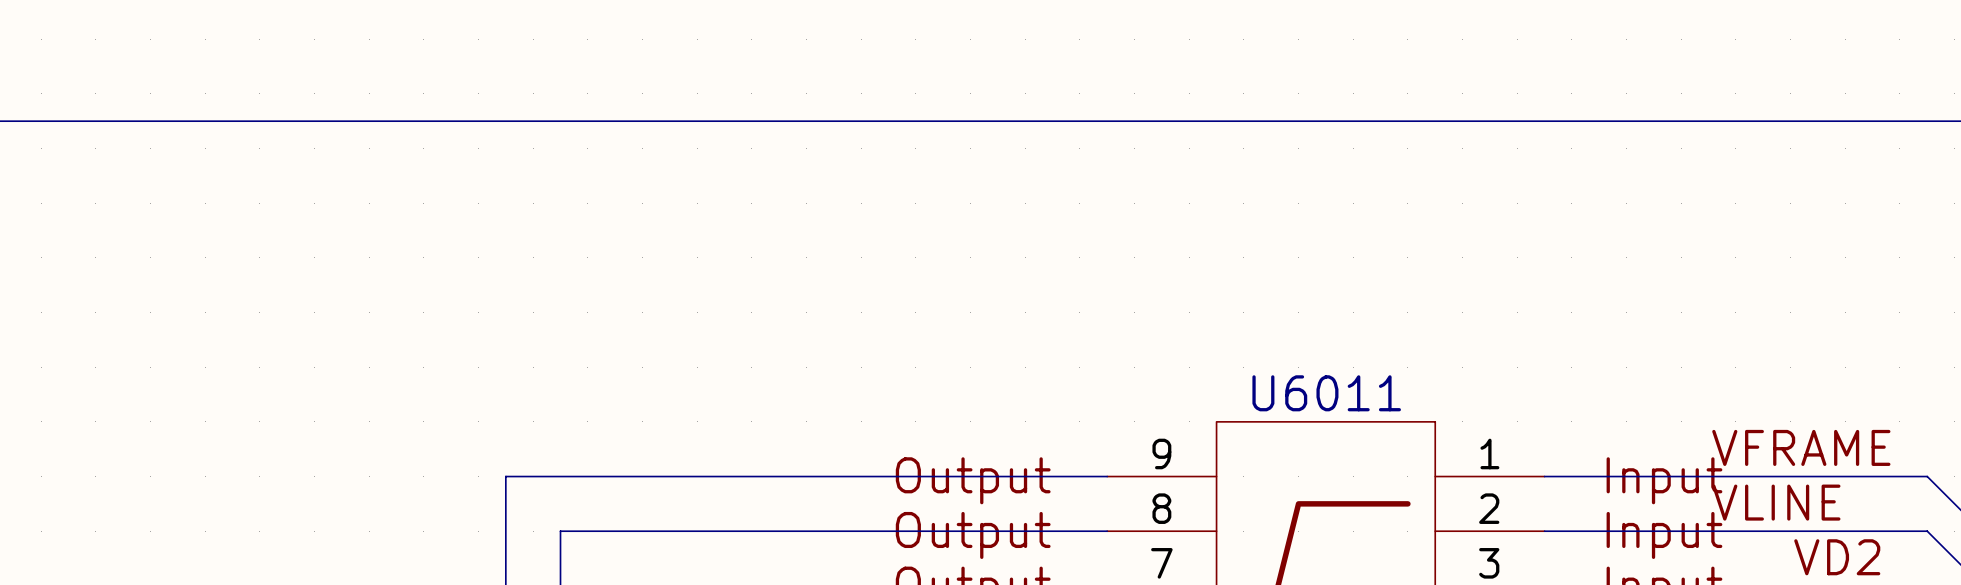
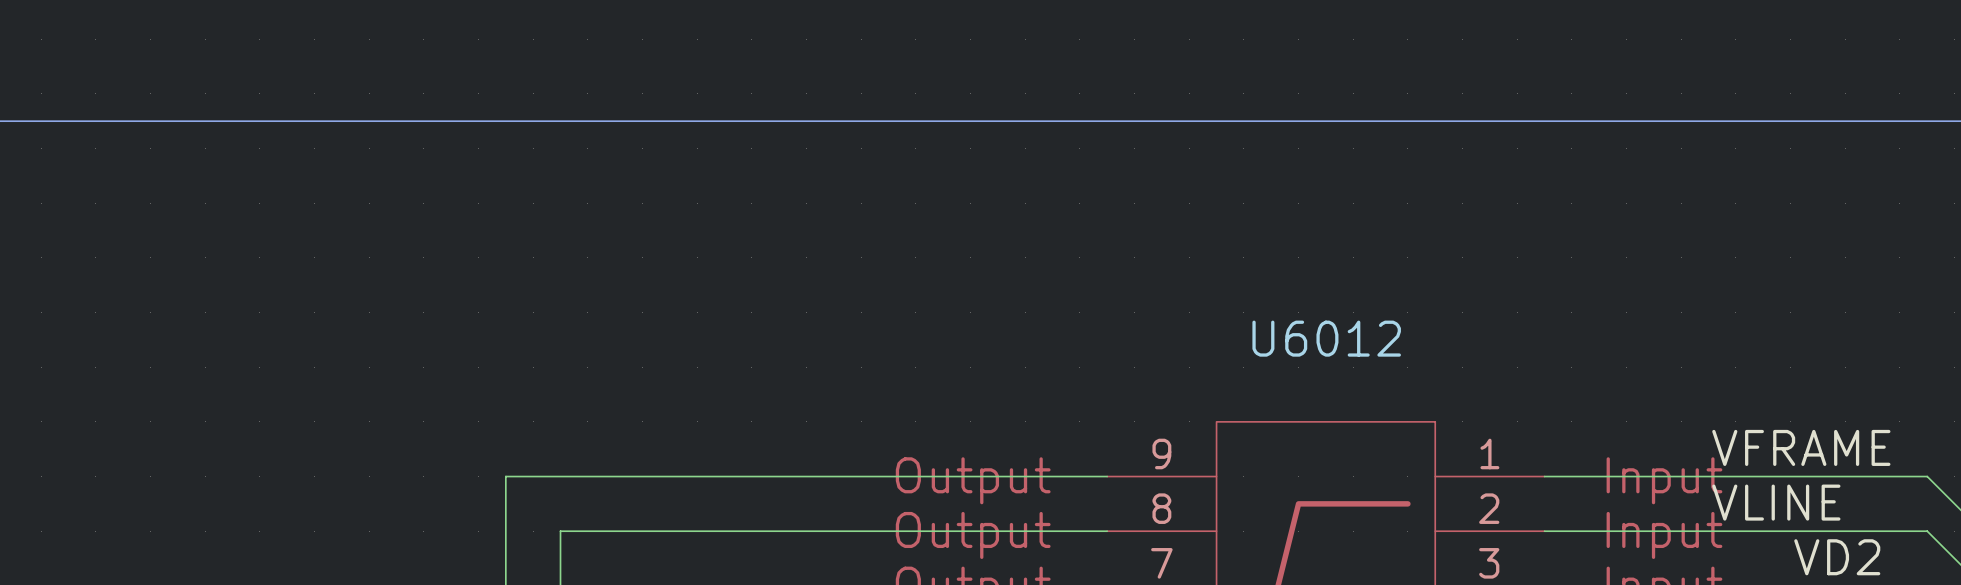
U6011 name: U6011 (1326, 393) -> U6012 (1326, 338)

